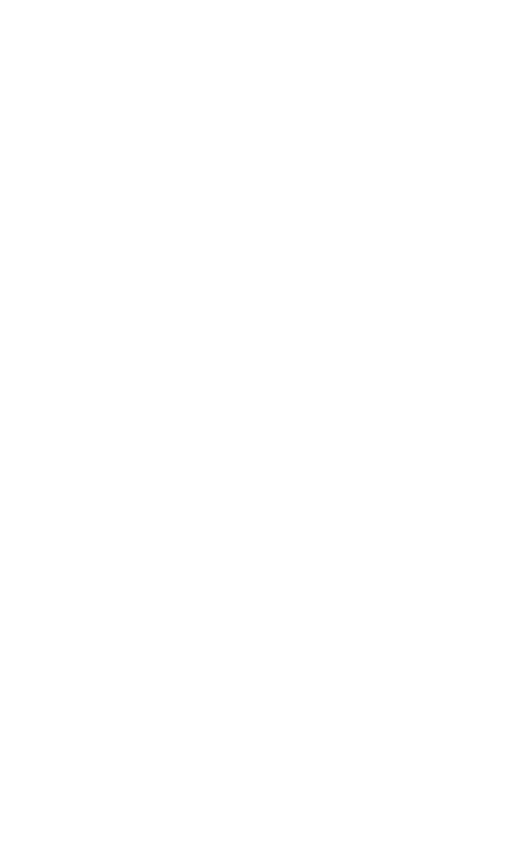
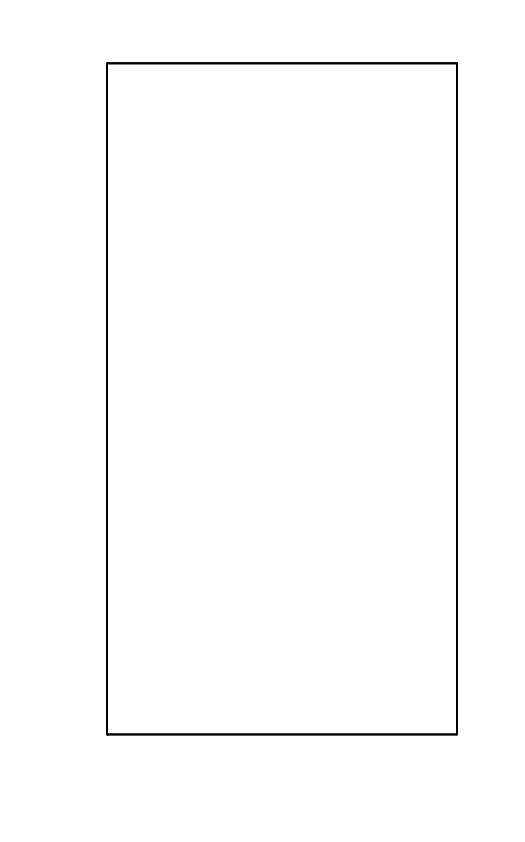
part: none -> (282, 398)

